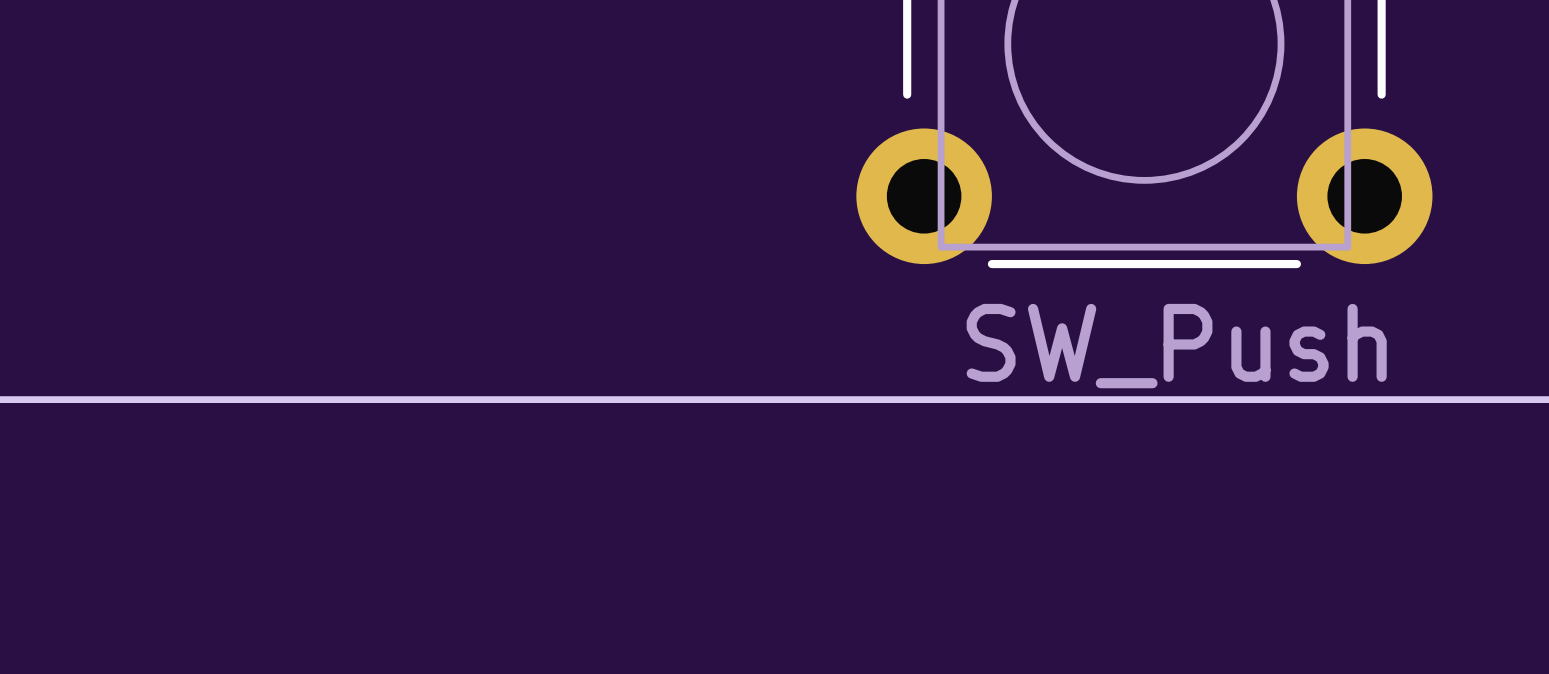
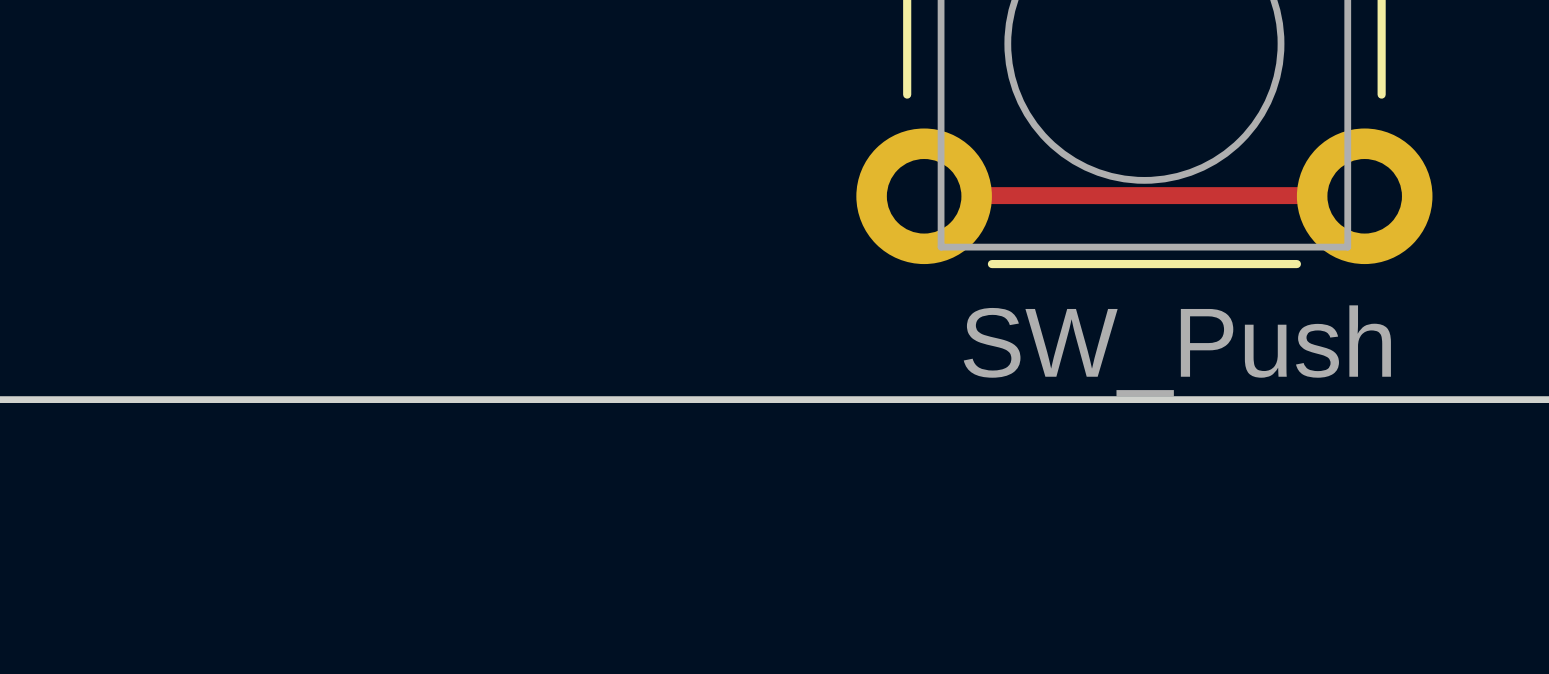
track: none -> (921, 195) (1361, 195)

